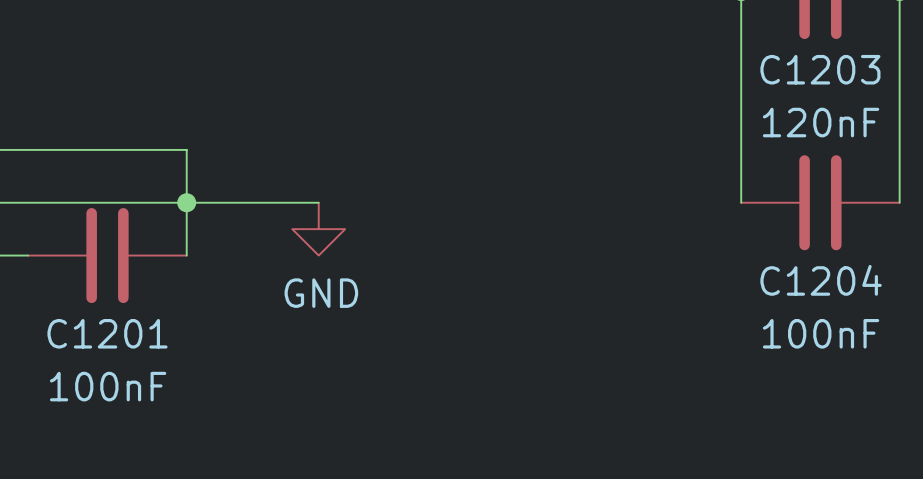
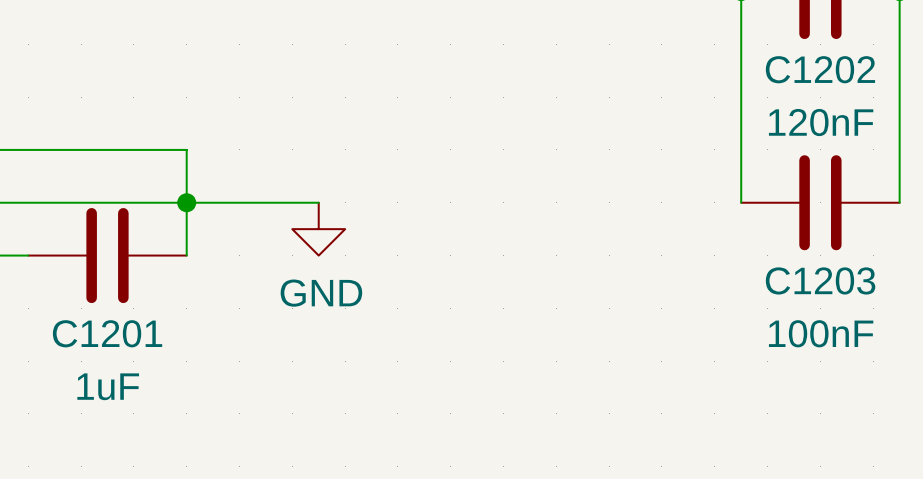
C1203 name: C1203 (820, 69) -> C1202 (820, 69)
C1204 name: C1204 (821, 280) -> C1203 (820, 280)
C1201 value: 100nF (108, 386) -> 1uF (108, 386)

